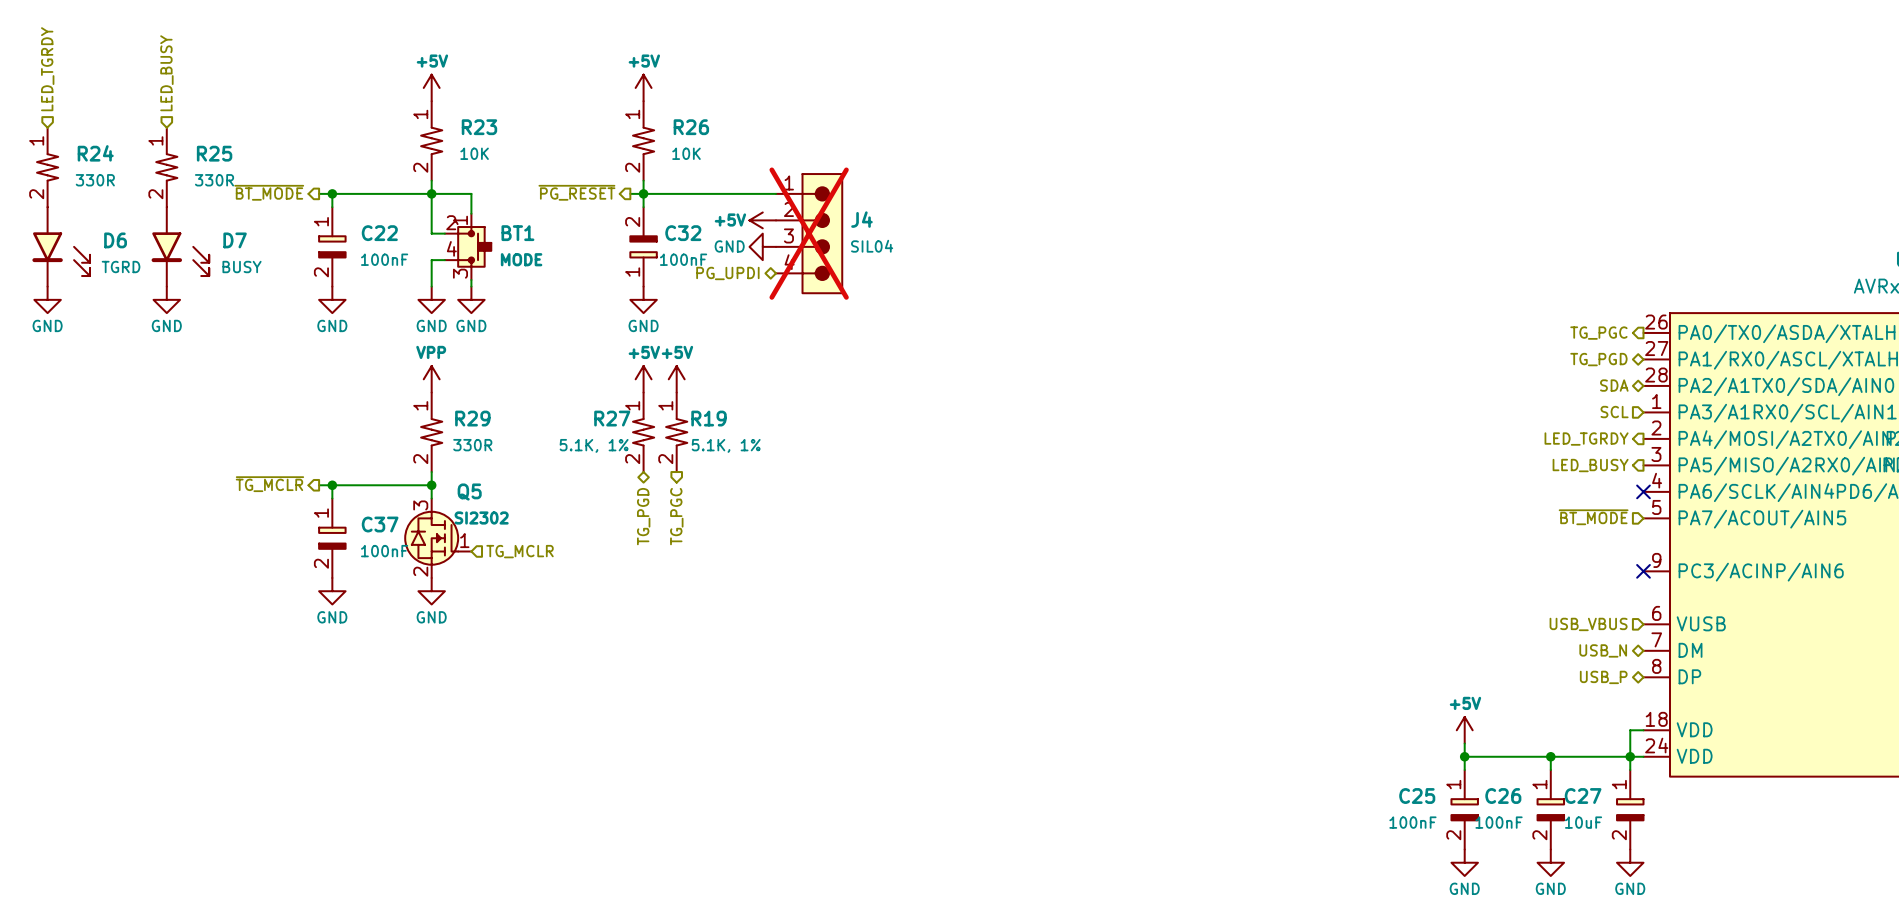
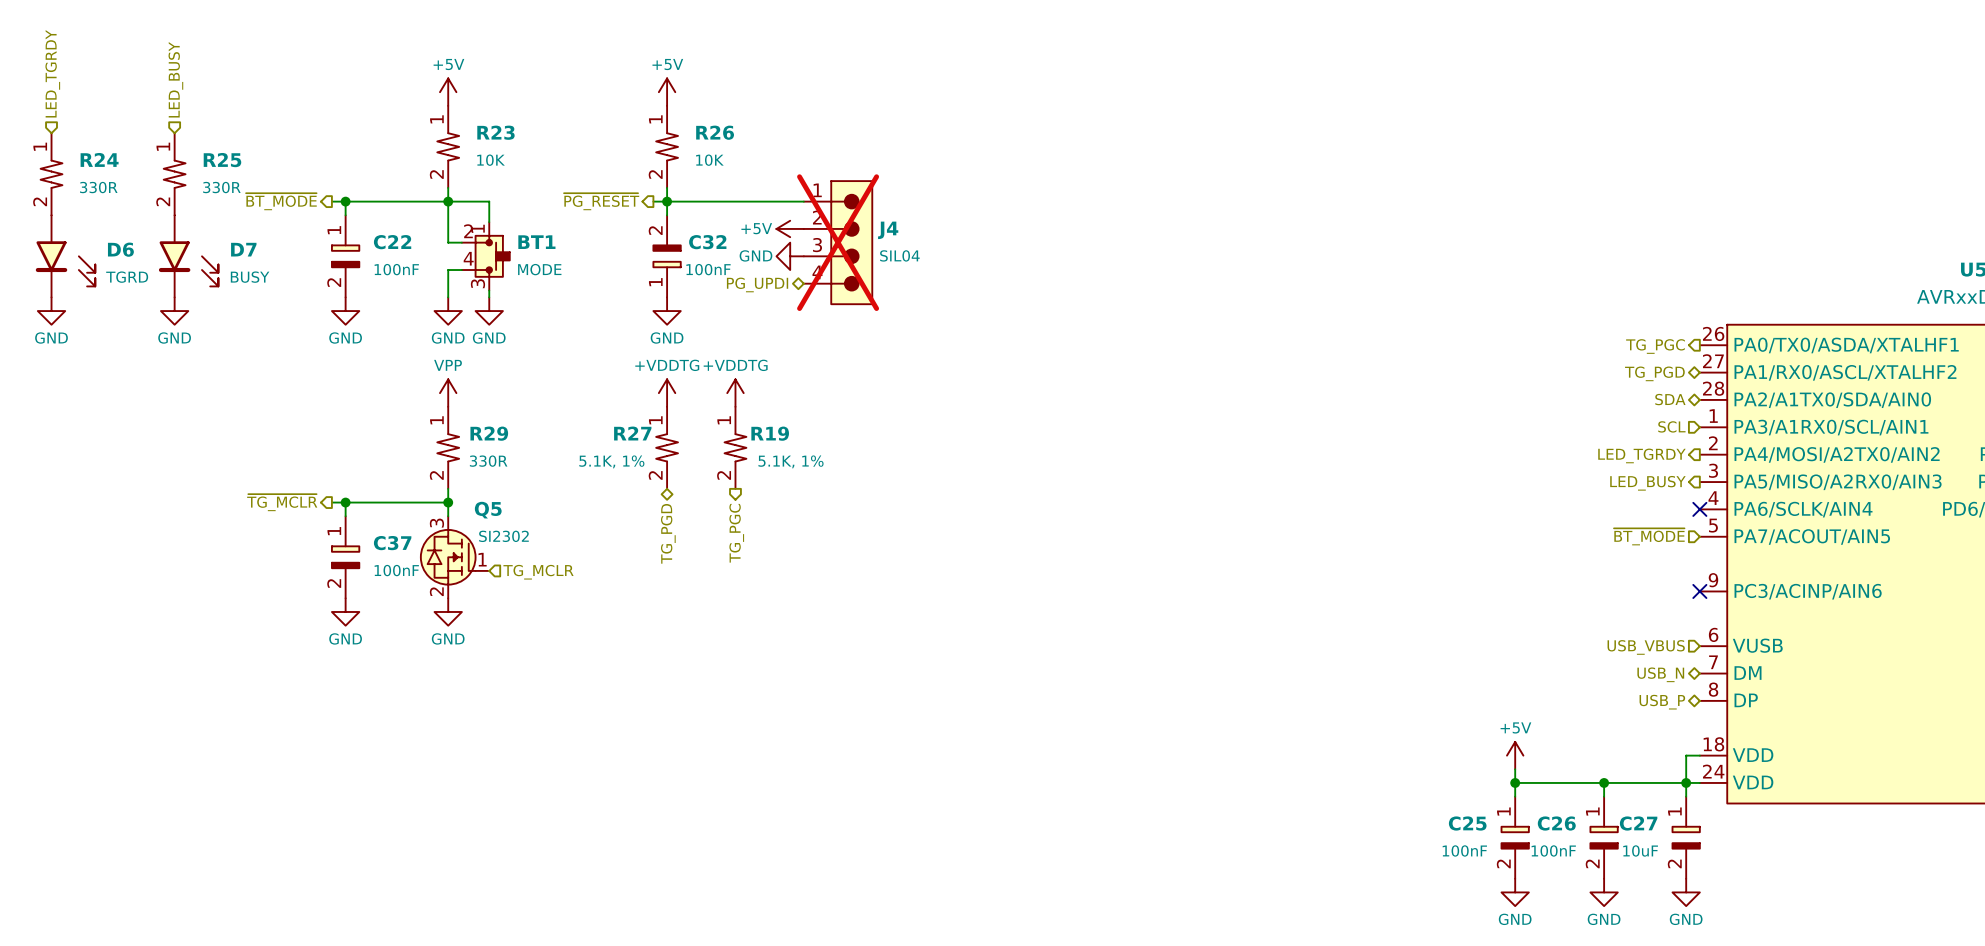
power symbol: +5V (643, 379) -> +VDDTG (667, 393)
power symbol: +5V (676, 379) -> none
power symbol: none -> +VDDTG (735, 393)
R19 position: (676, 432) -> (735, 447)
hierarchical label position: TG_PGC (676, 516) -> TG_PGC (736, 533)

